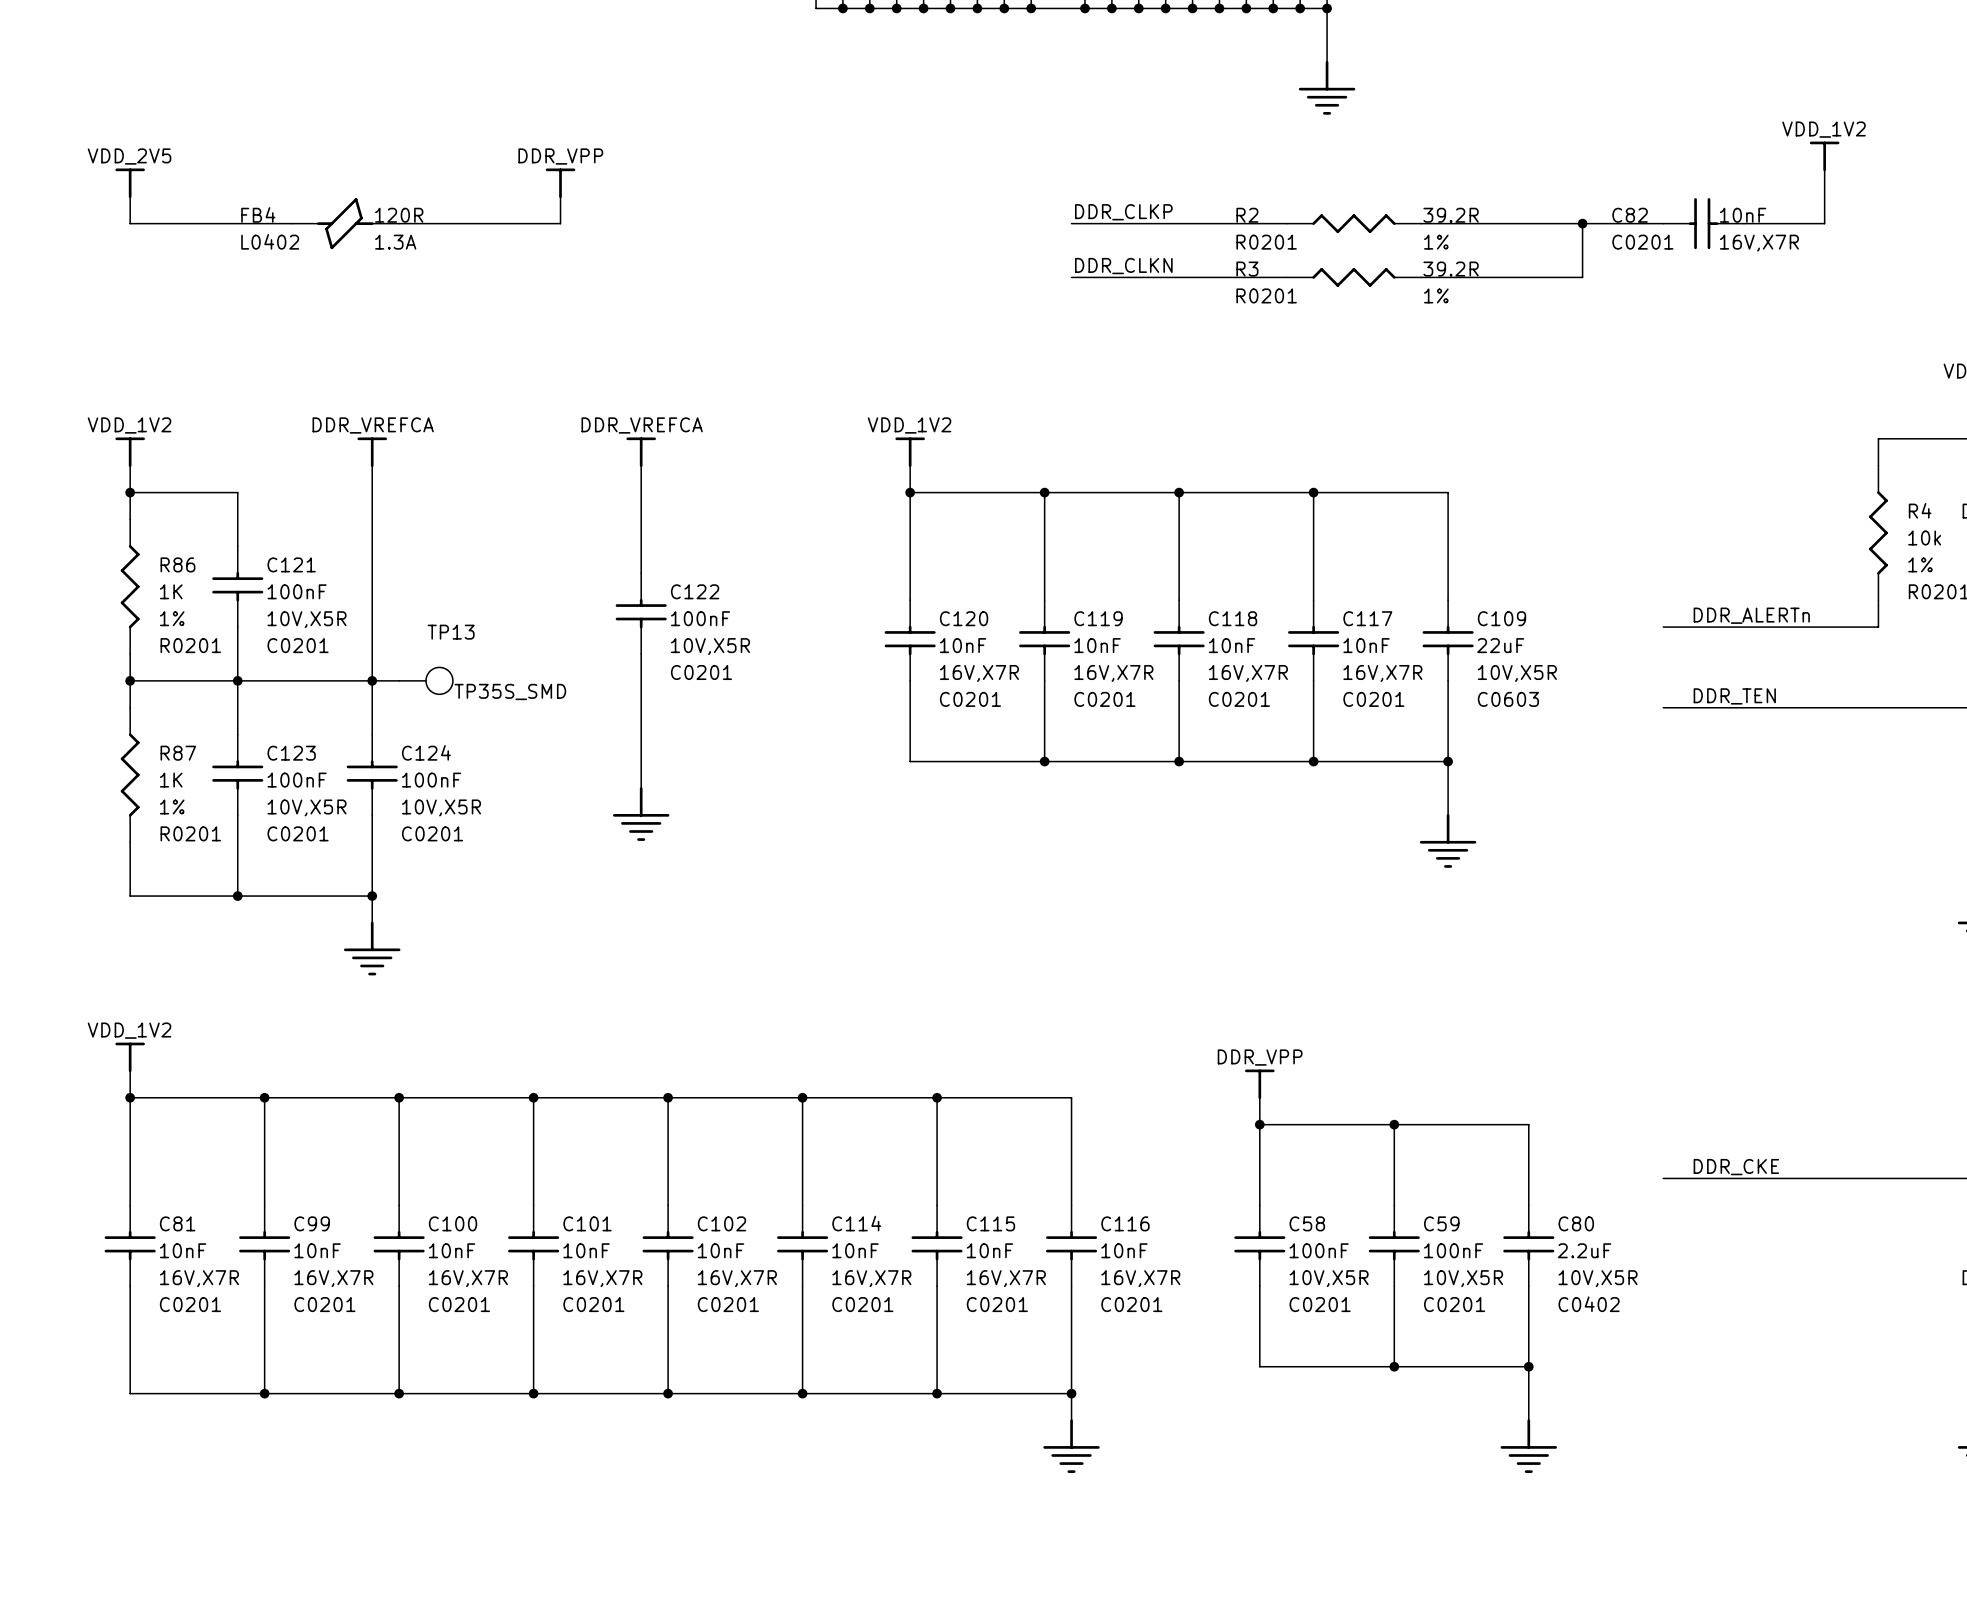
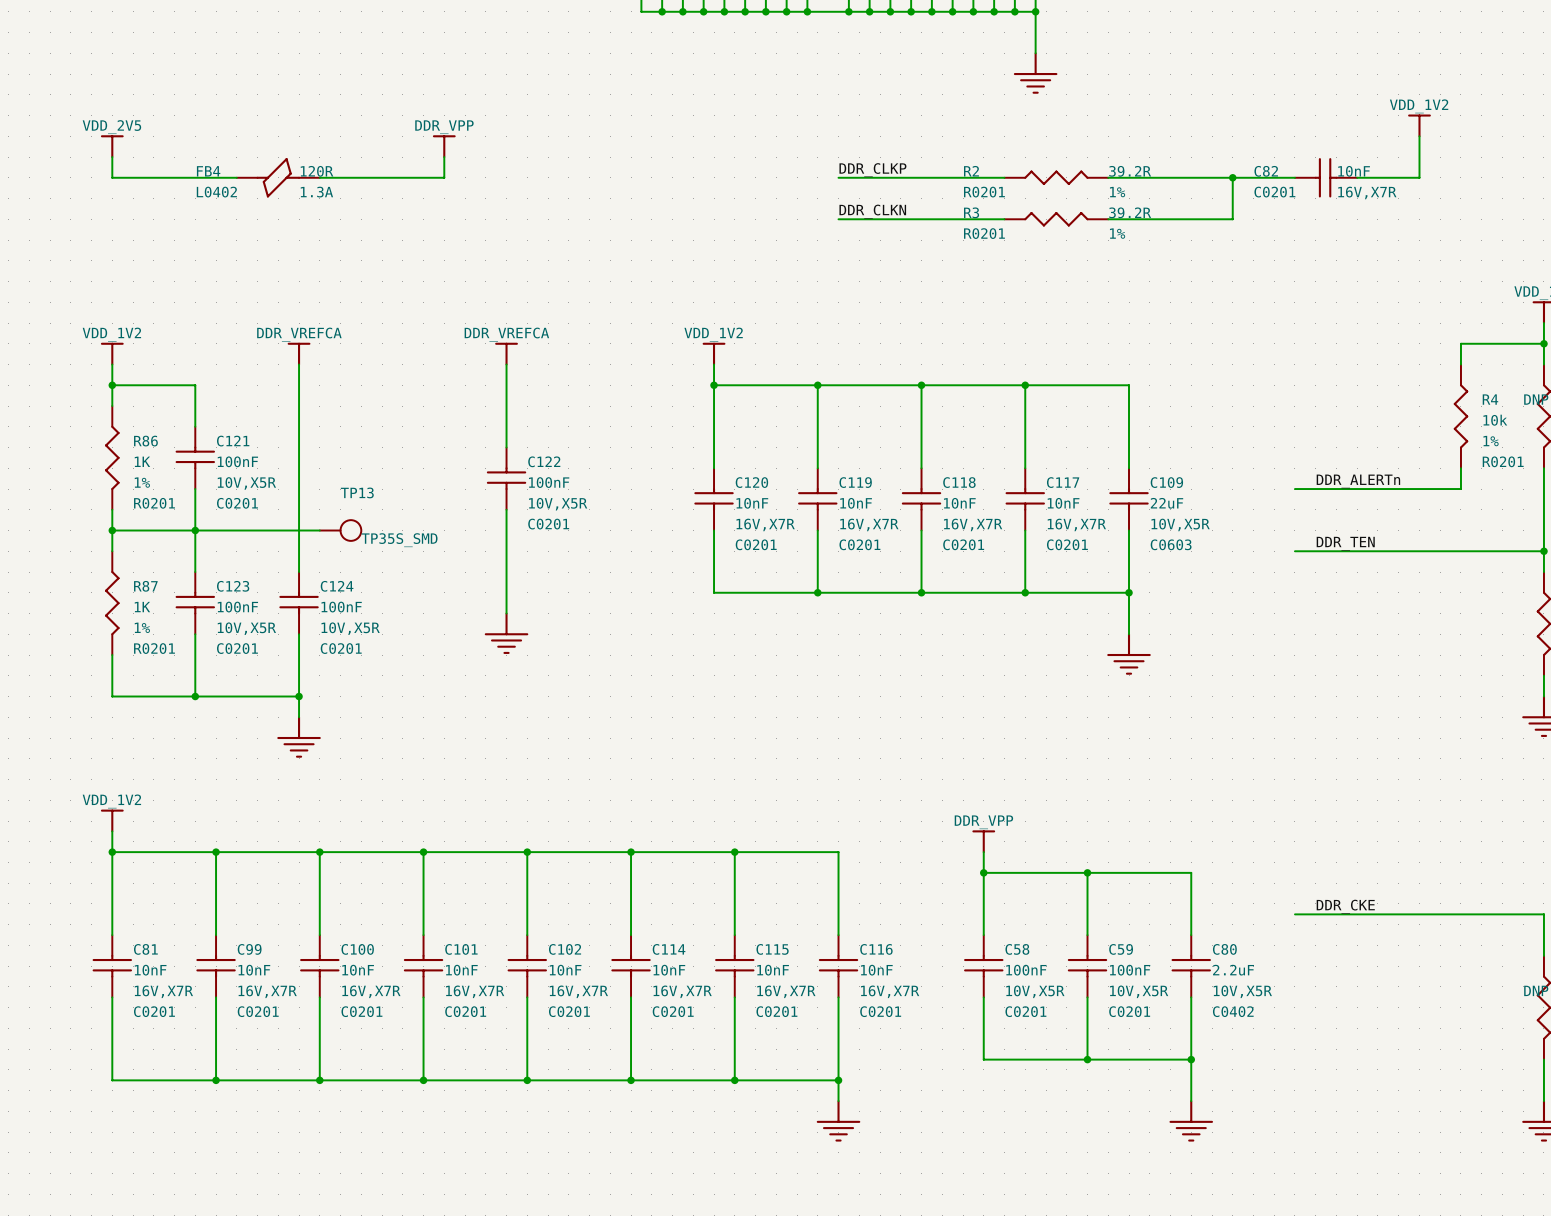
junction: (372, 680) -> none

